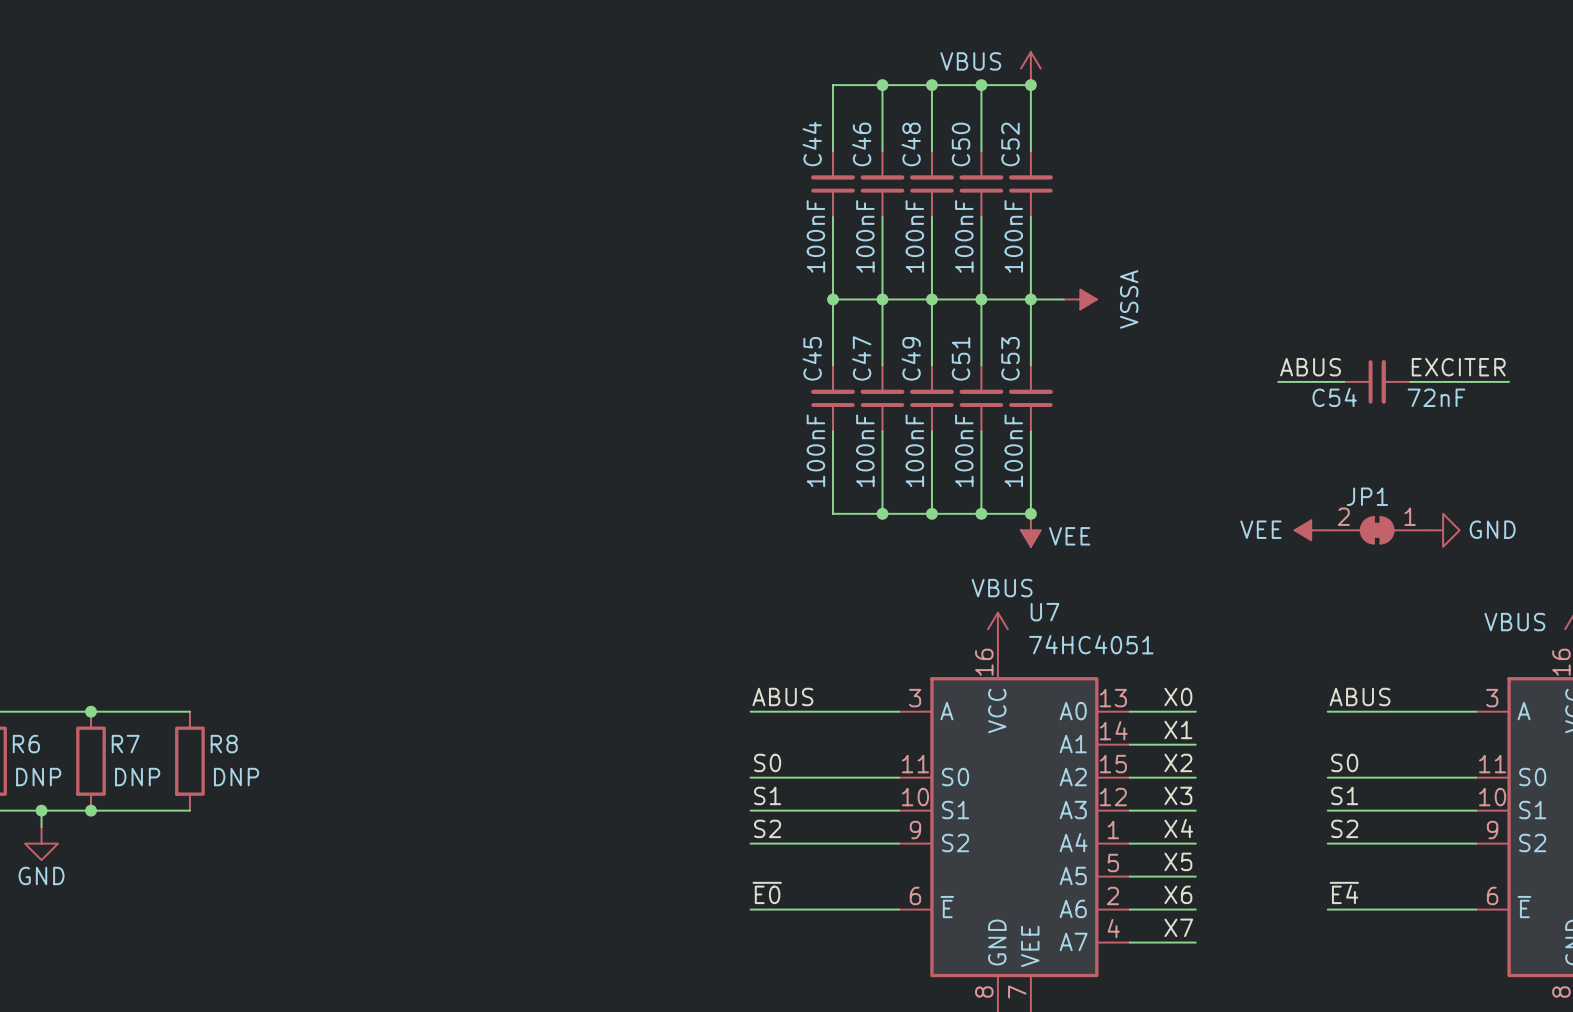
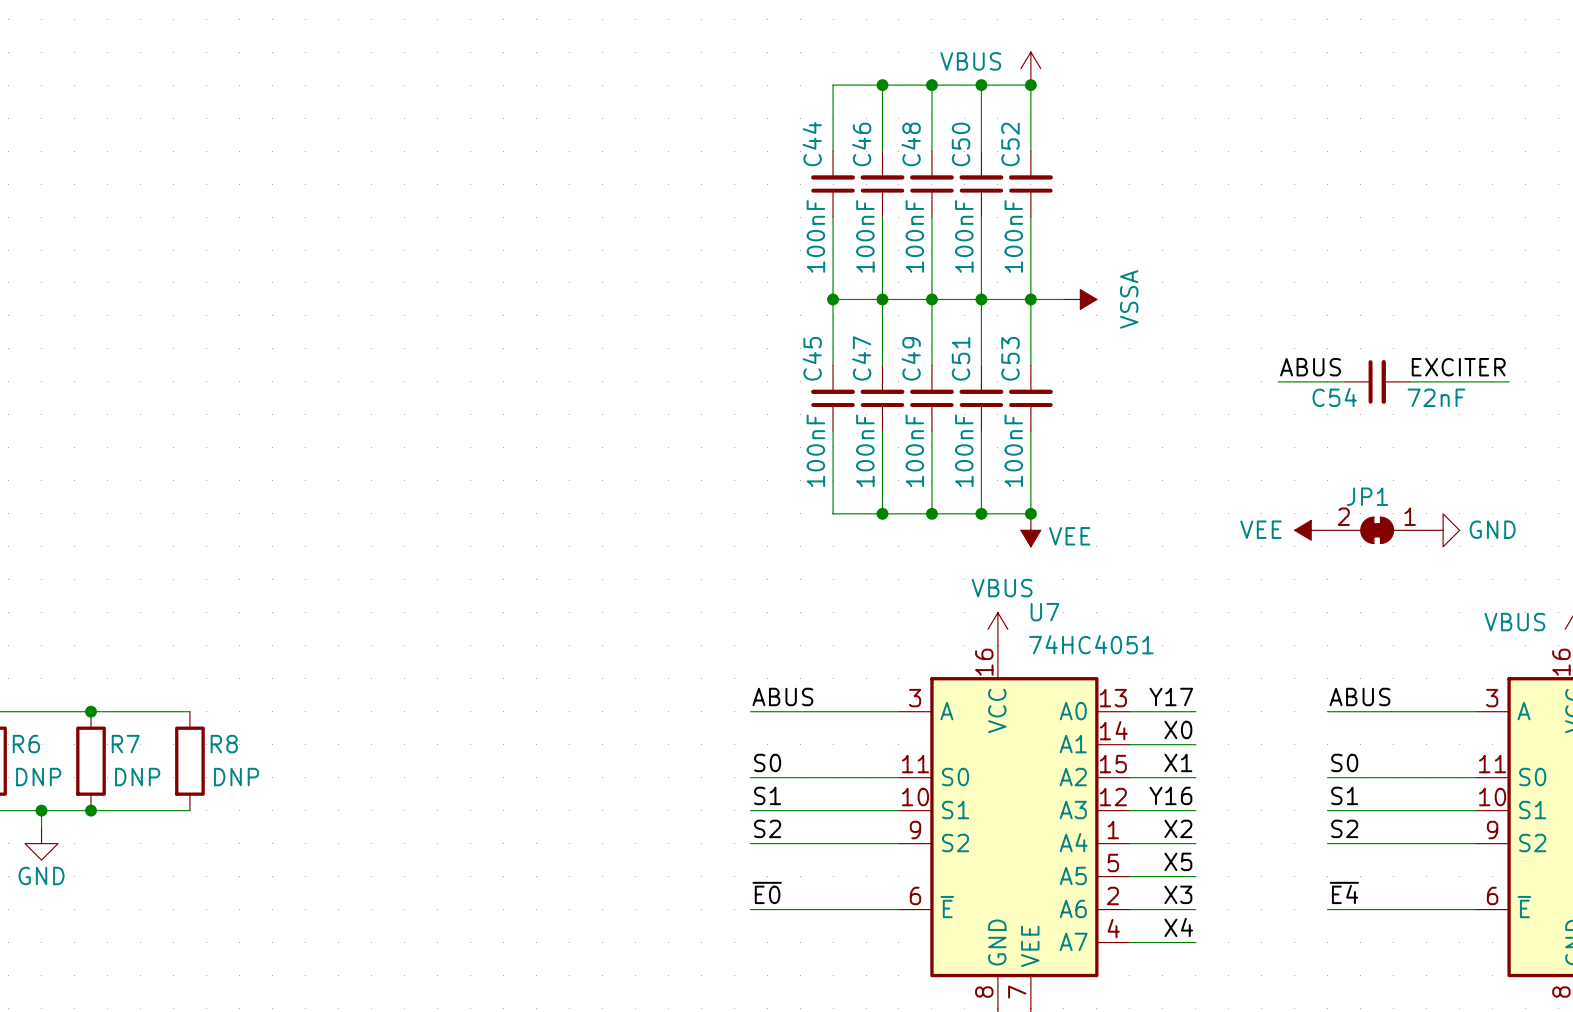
label: X0 (1178, 696) -> Y17 (1171, 696)
label: X1 (1178, 729) -> X0 (1178, 729)
label: X2 (1178, 762) -> X1 (1178, 762)
label: X3 (1178, 795) -> Y16 (1170, 795)
label: X4 (1178, 828) -> X2 (1178, 828)
label: X6 (1178, 894) -> X3 (1178, 894)
label: X7 (1178, 927) -> X4 (1178, 927)

